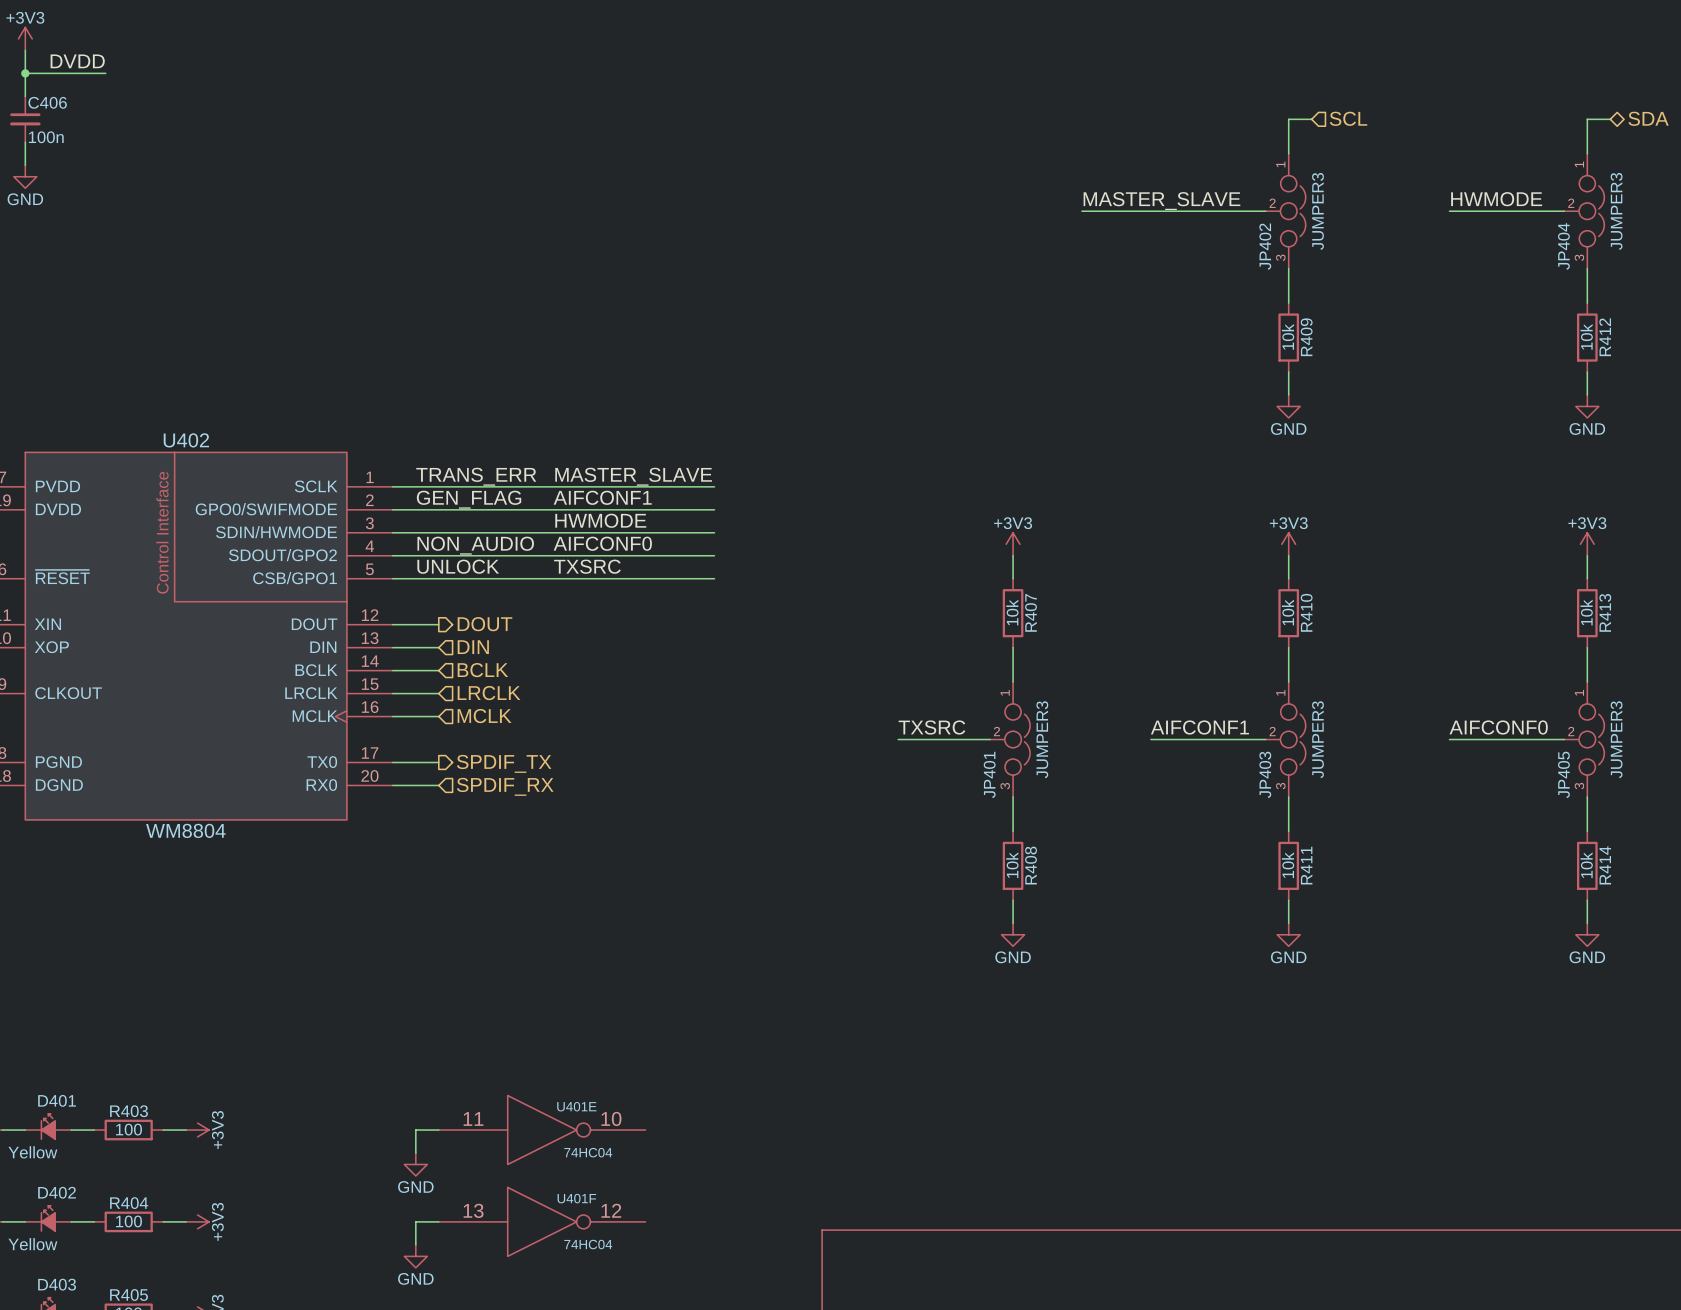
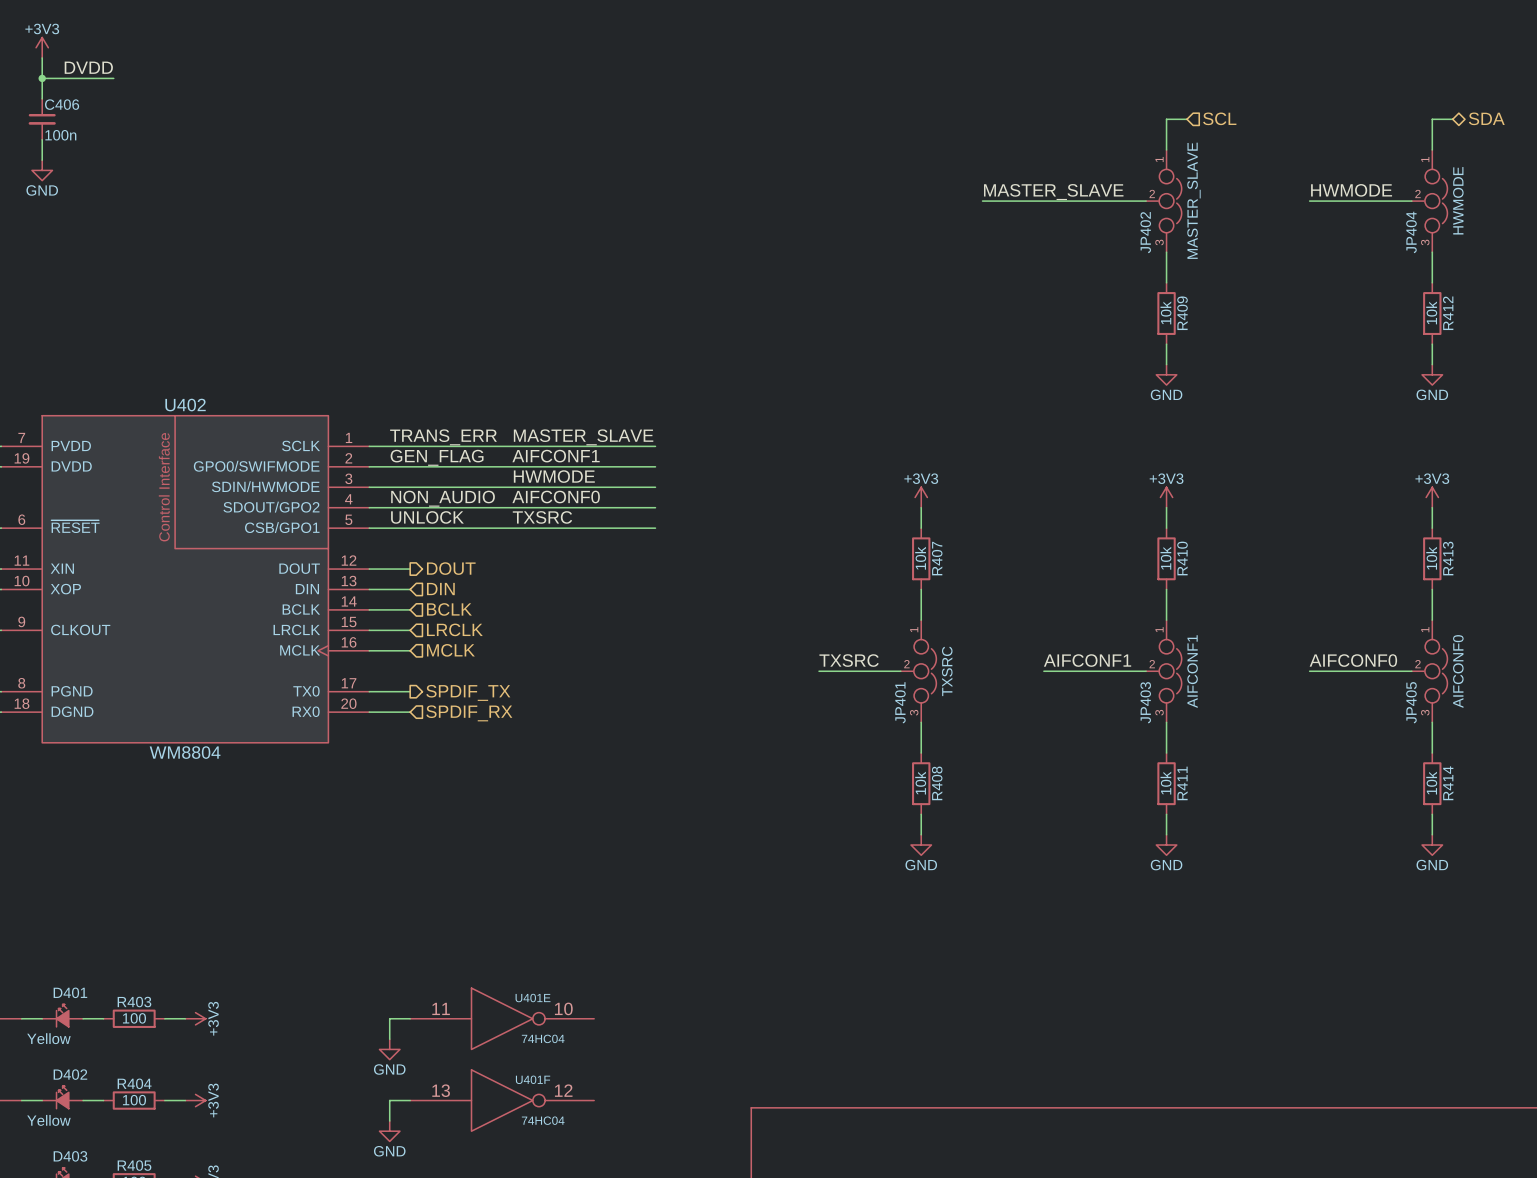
JP402 value: JUMPER3 (1317, 211) -> MASTER_SLAVE (1193, 200)
JP404 value: JUMPER3 (1616, 211) -> HWMODE (1458, 200)
JP401 value: JUMPER3 (1042, 739) -> TXSRC (947, 671)
JP403 value: JUMPER3 (1317, 739) -> AIFCONF1 (1192, 671)
JP405 value: JUMPER3 (1616, 739) -> AIFCONF0 (1458, 671)

